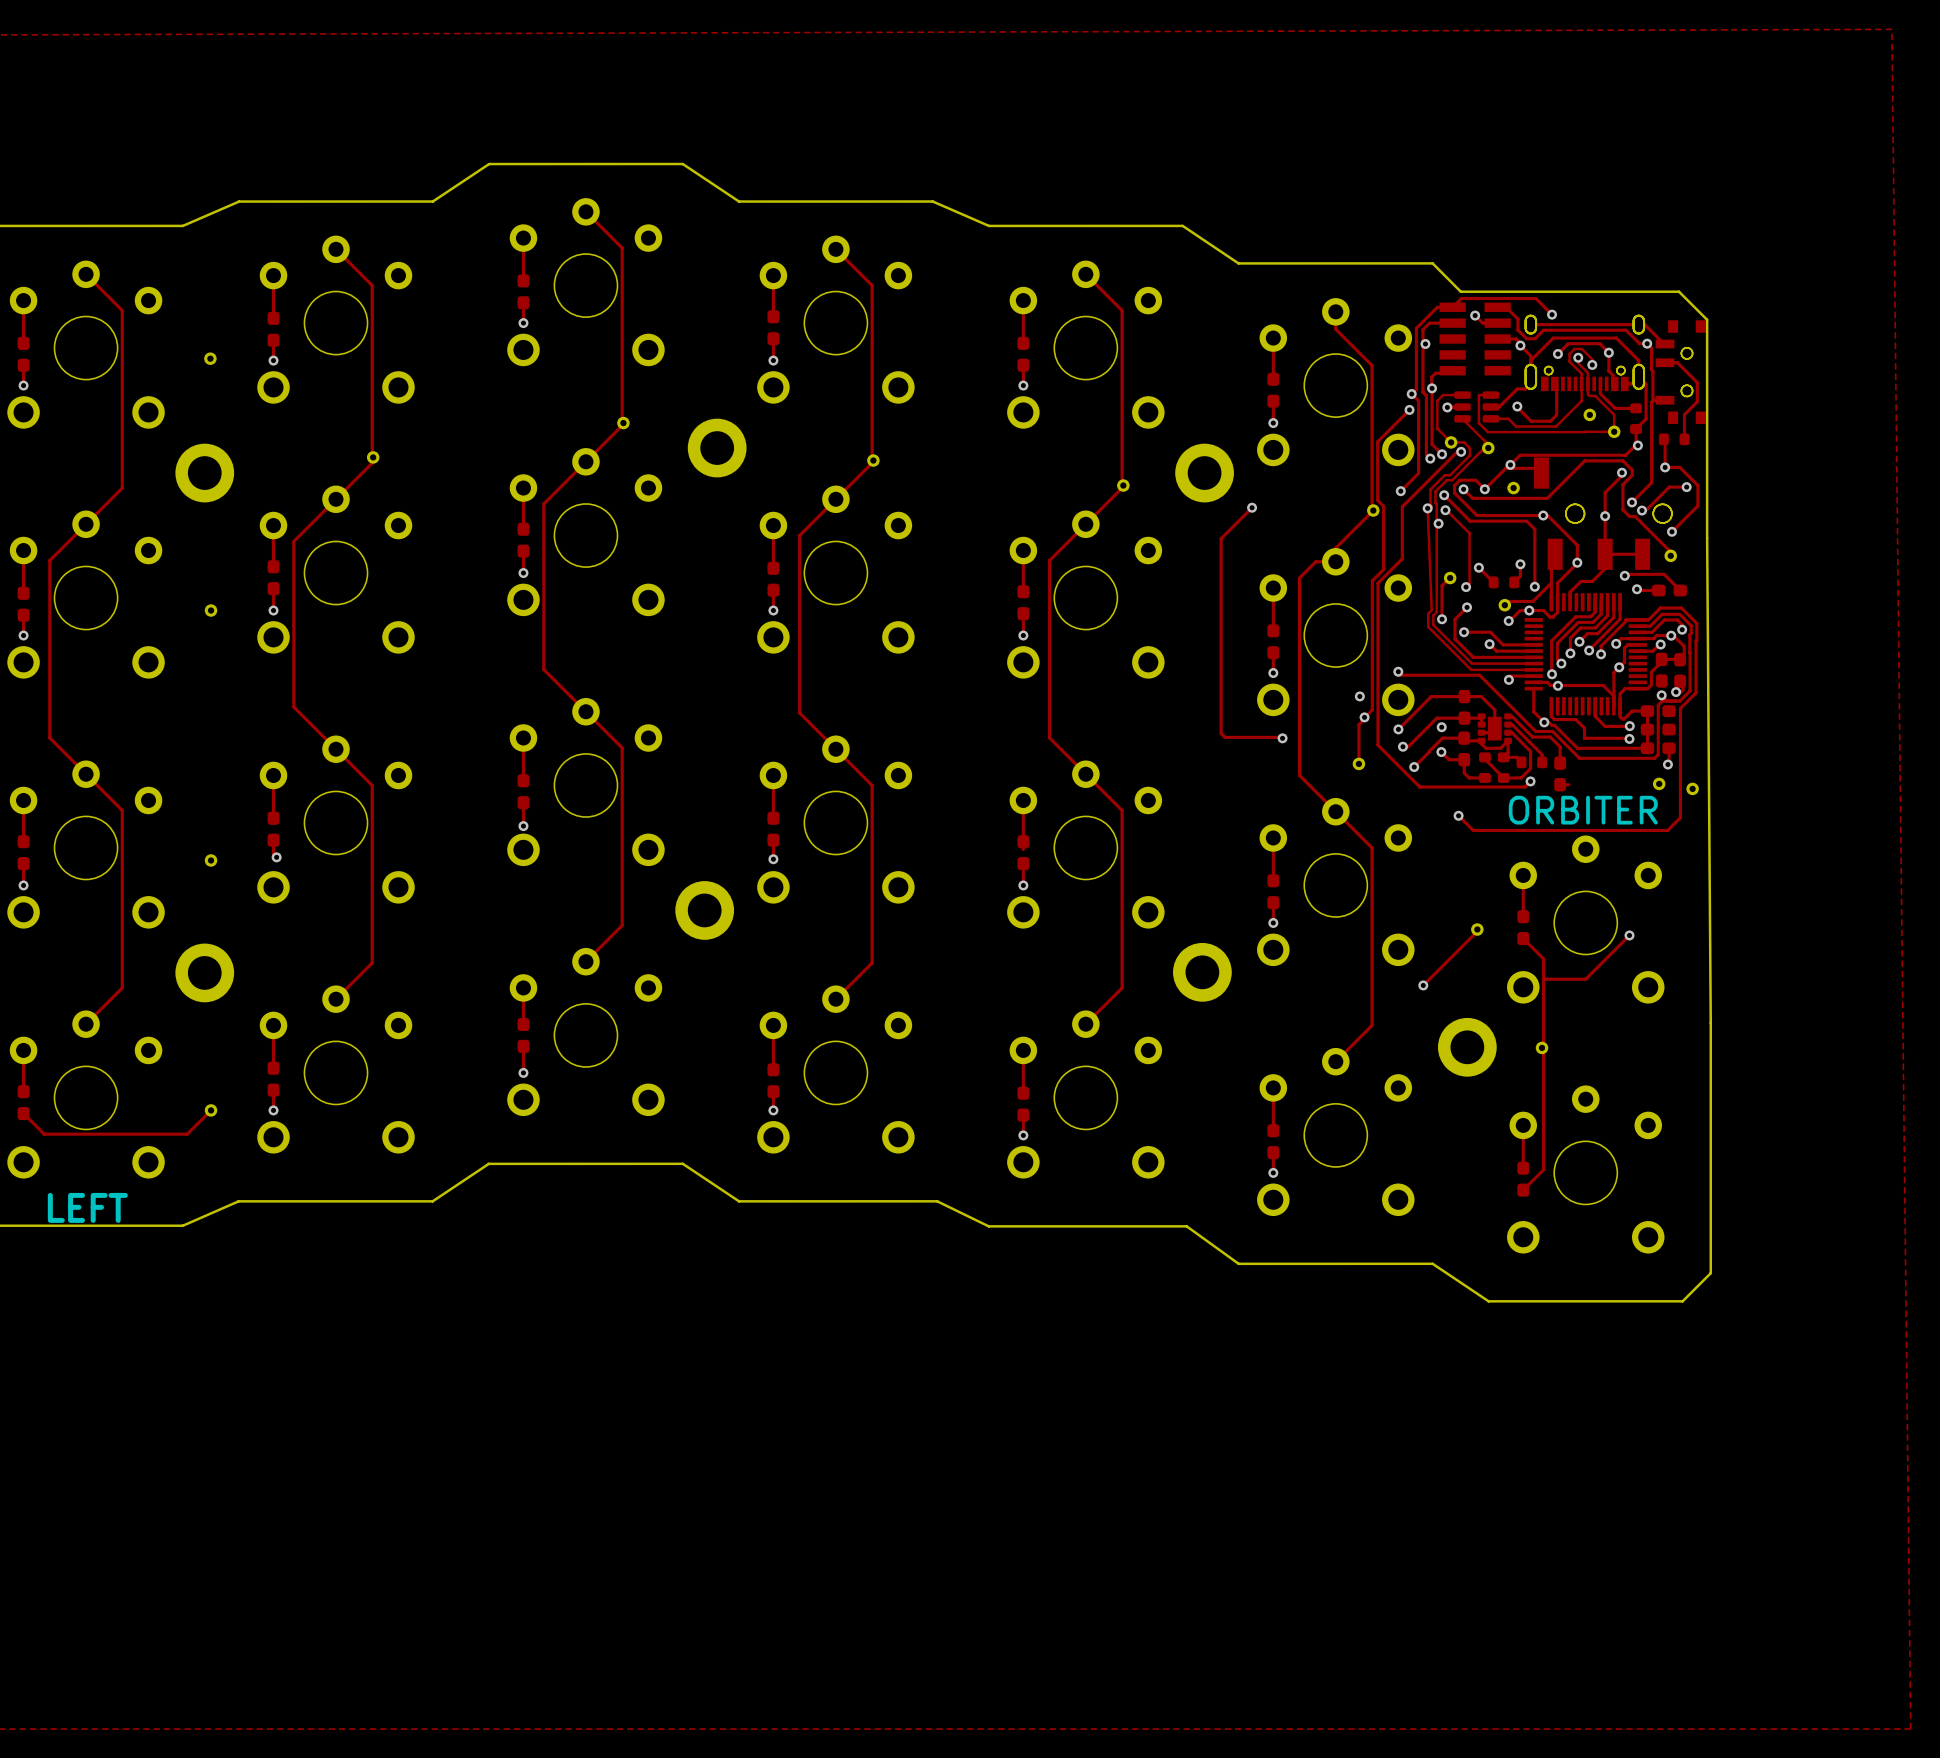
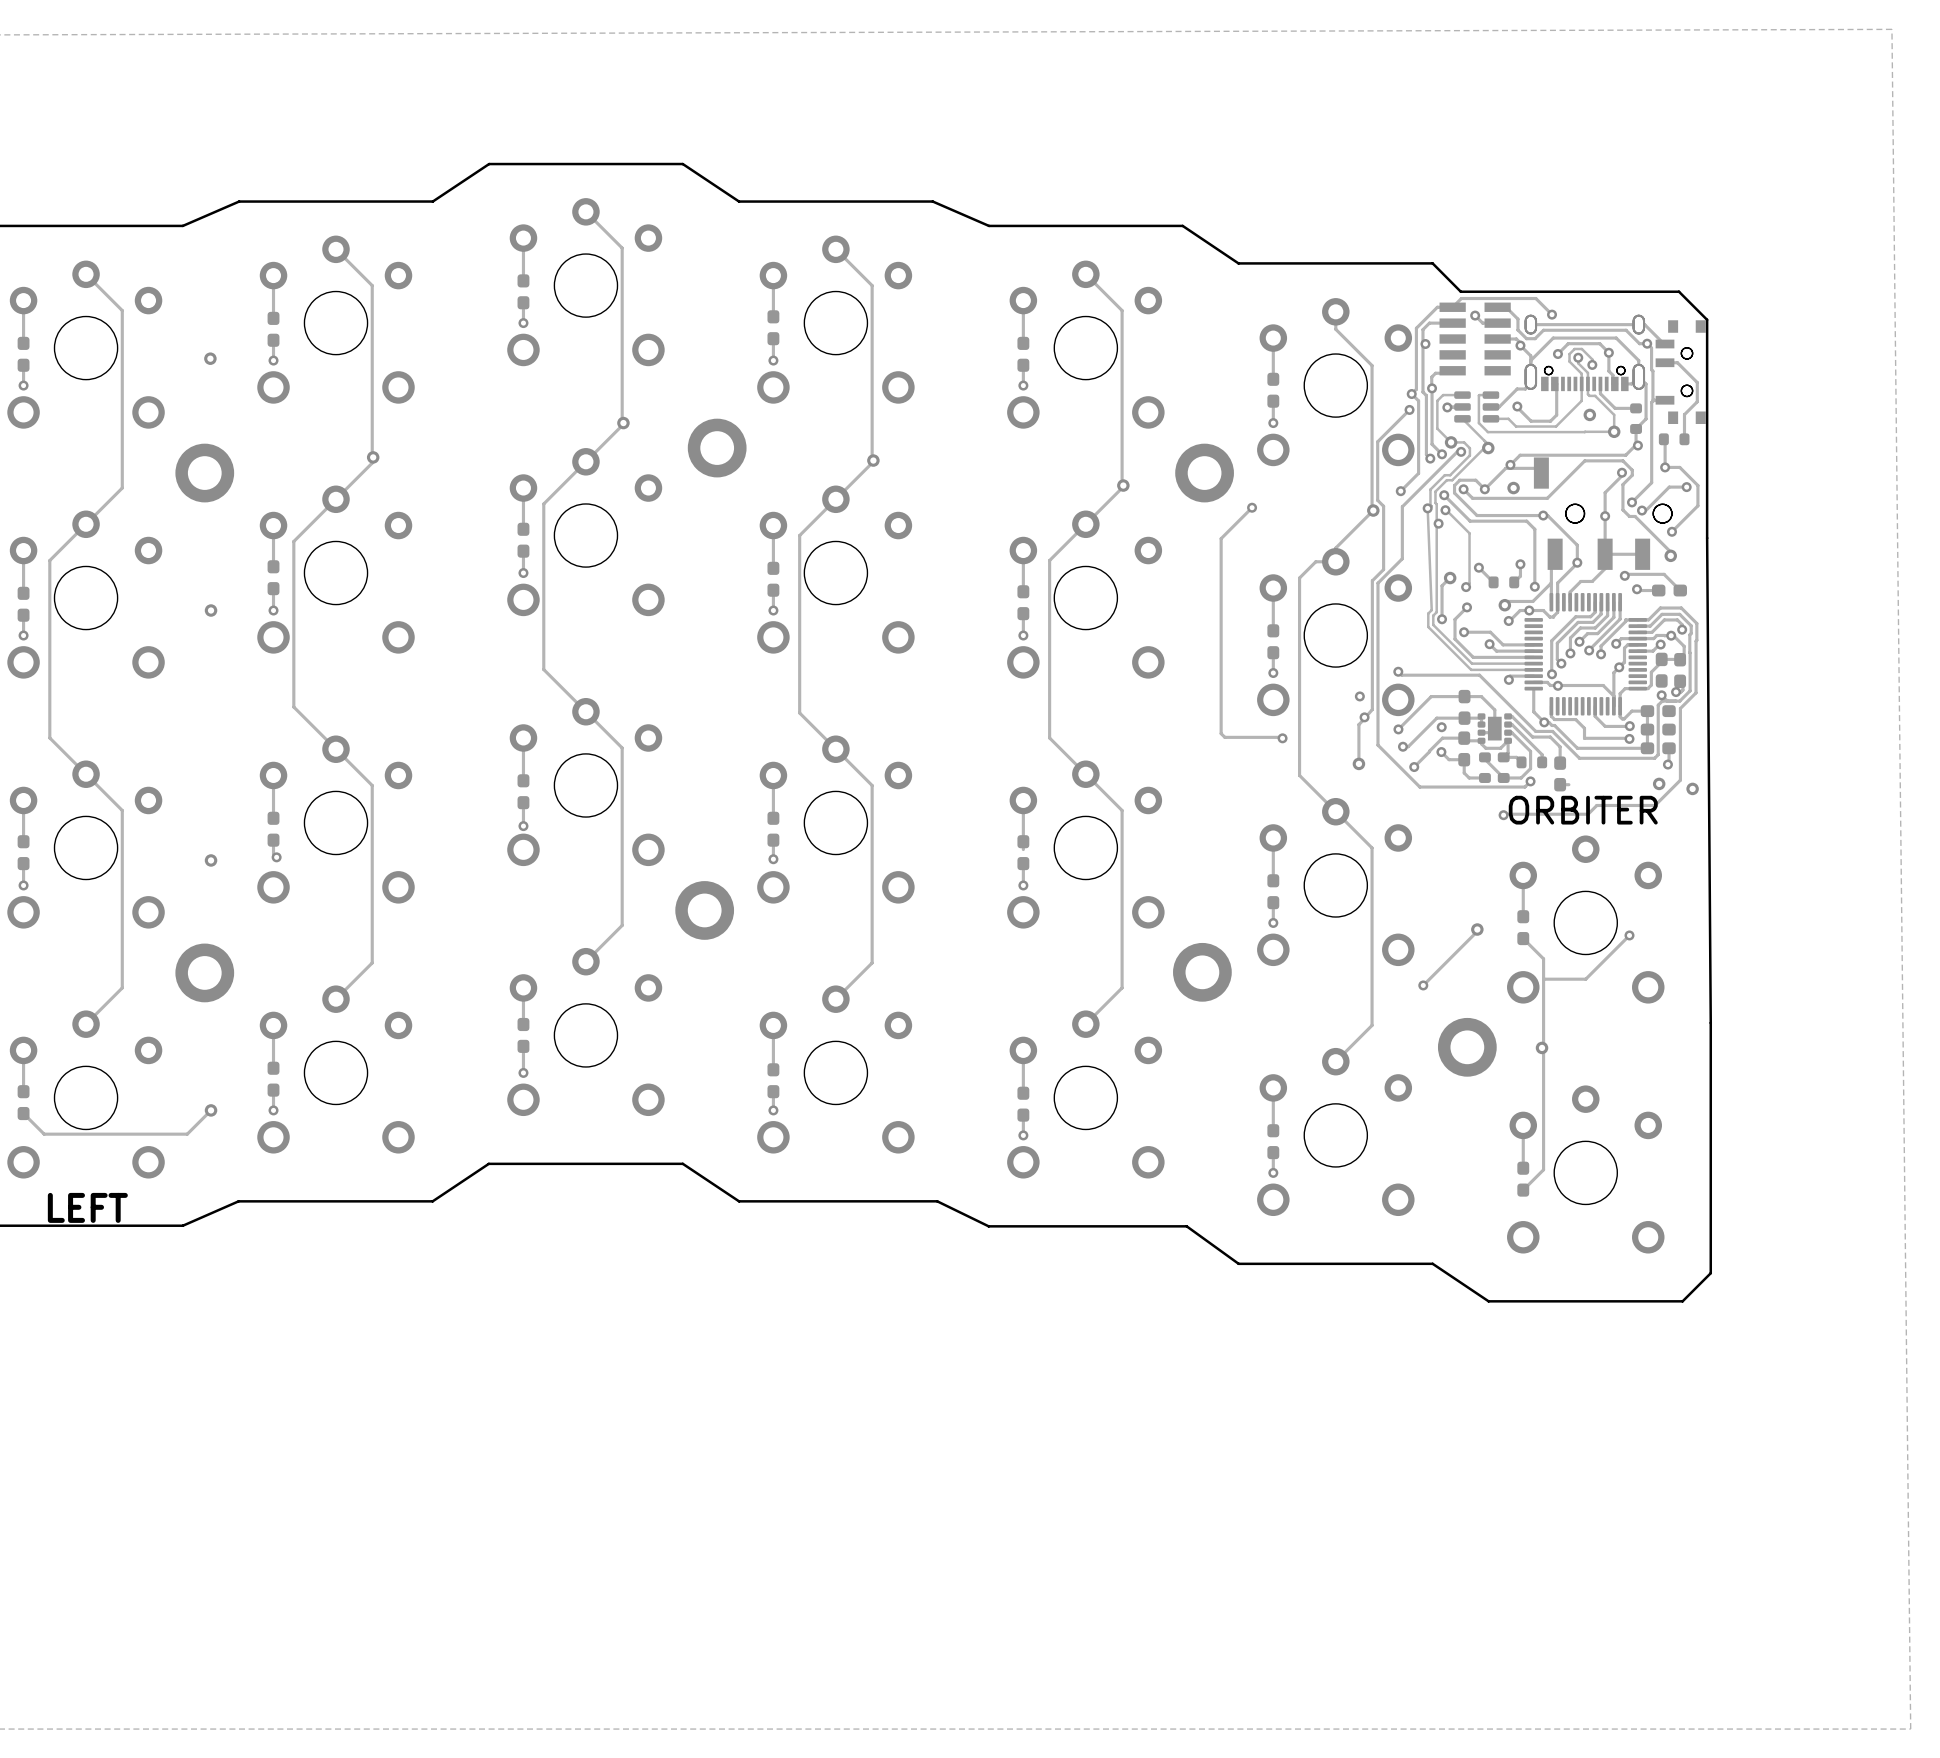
track: (1680, 780) (1680, 817) (1667, 830) (1473, 830) (1458, 815) -> (1680, 780) (1655, 805) (1596, 805) (1588, 814) (1503, 815)
via position: (1458, 815) -> (1503, 815)

